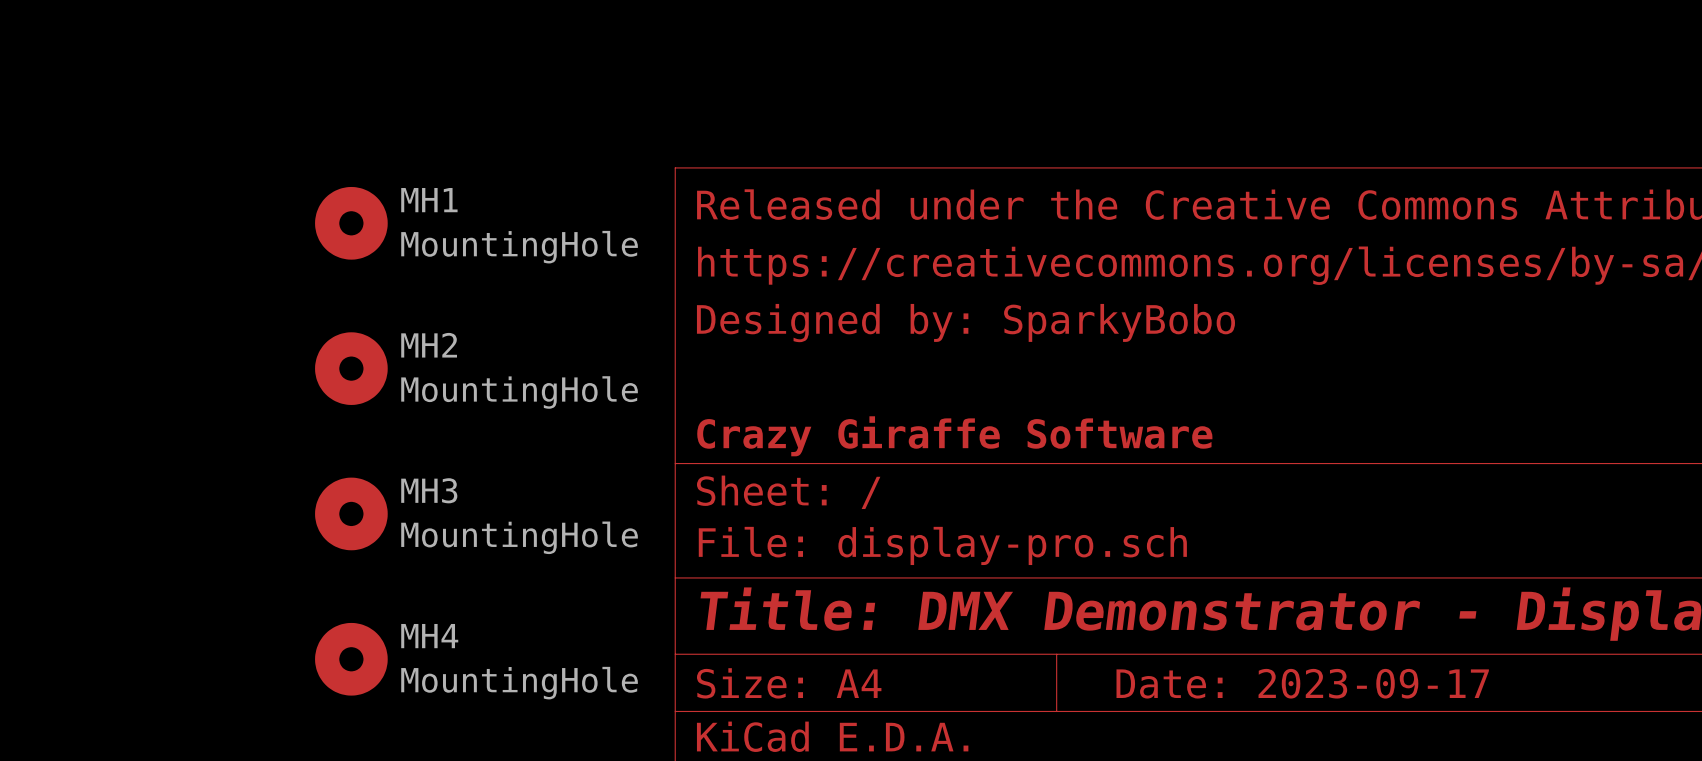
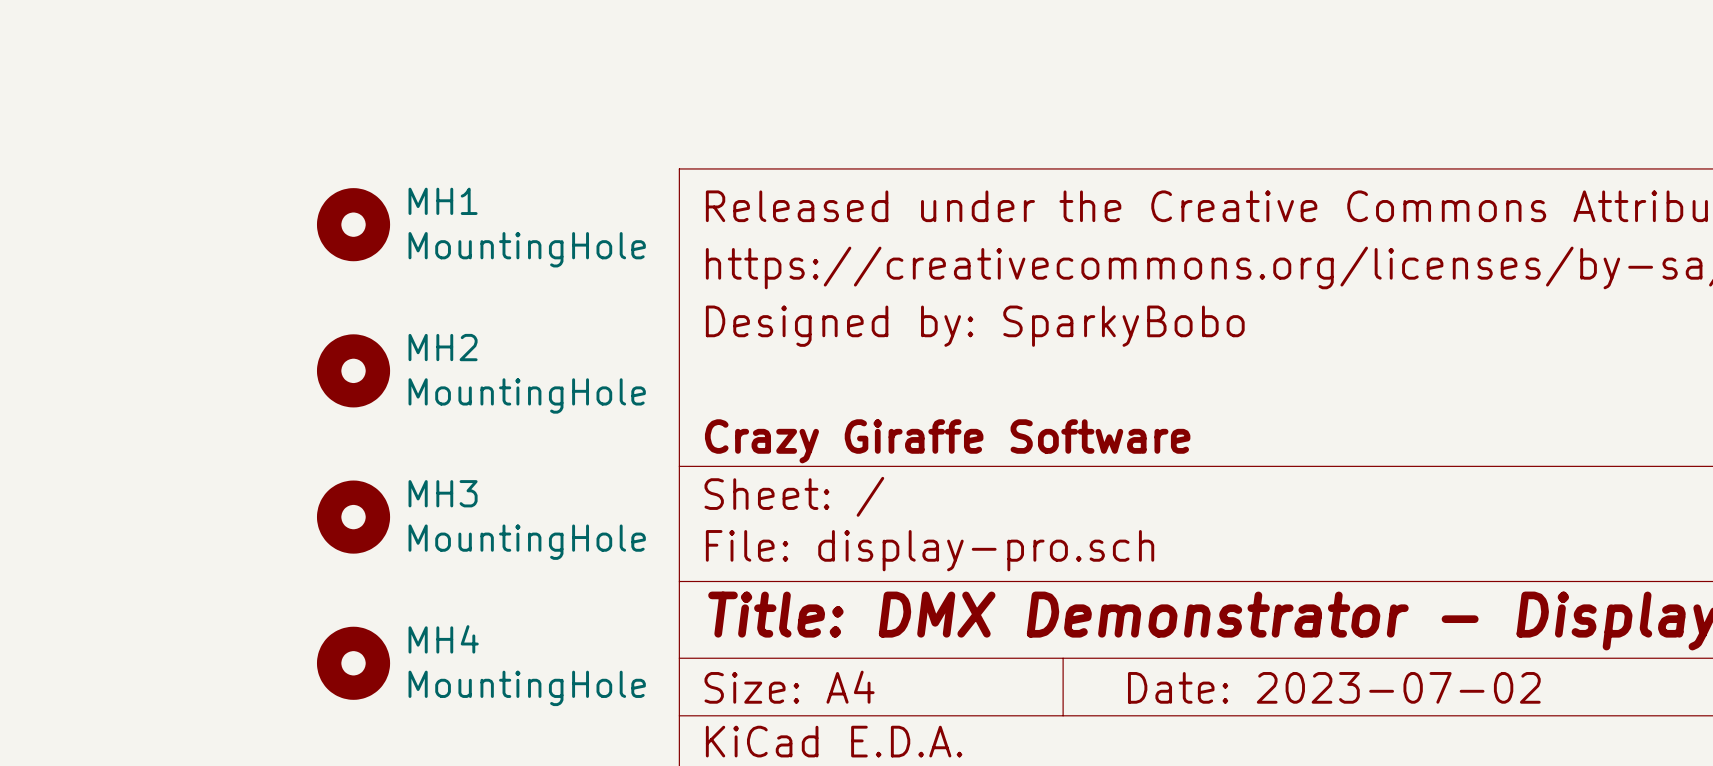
title block: Date: 2023-09-17 (1302, 683) -> Date: 2023-07-02 (1334, 687)

